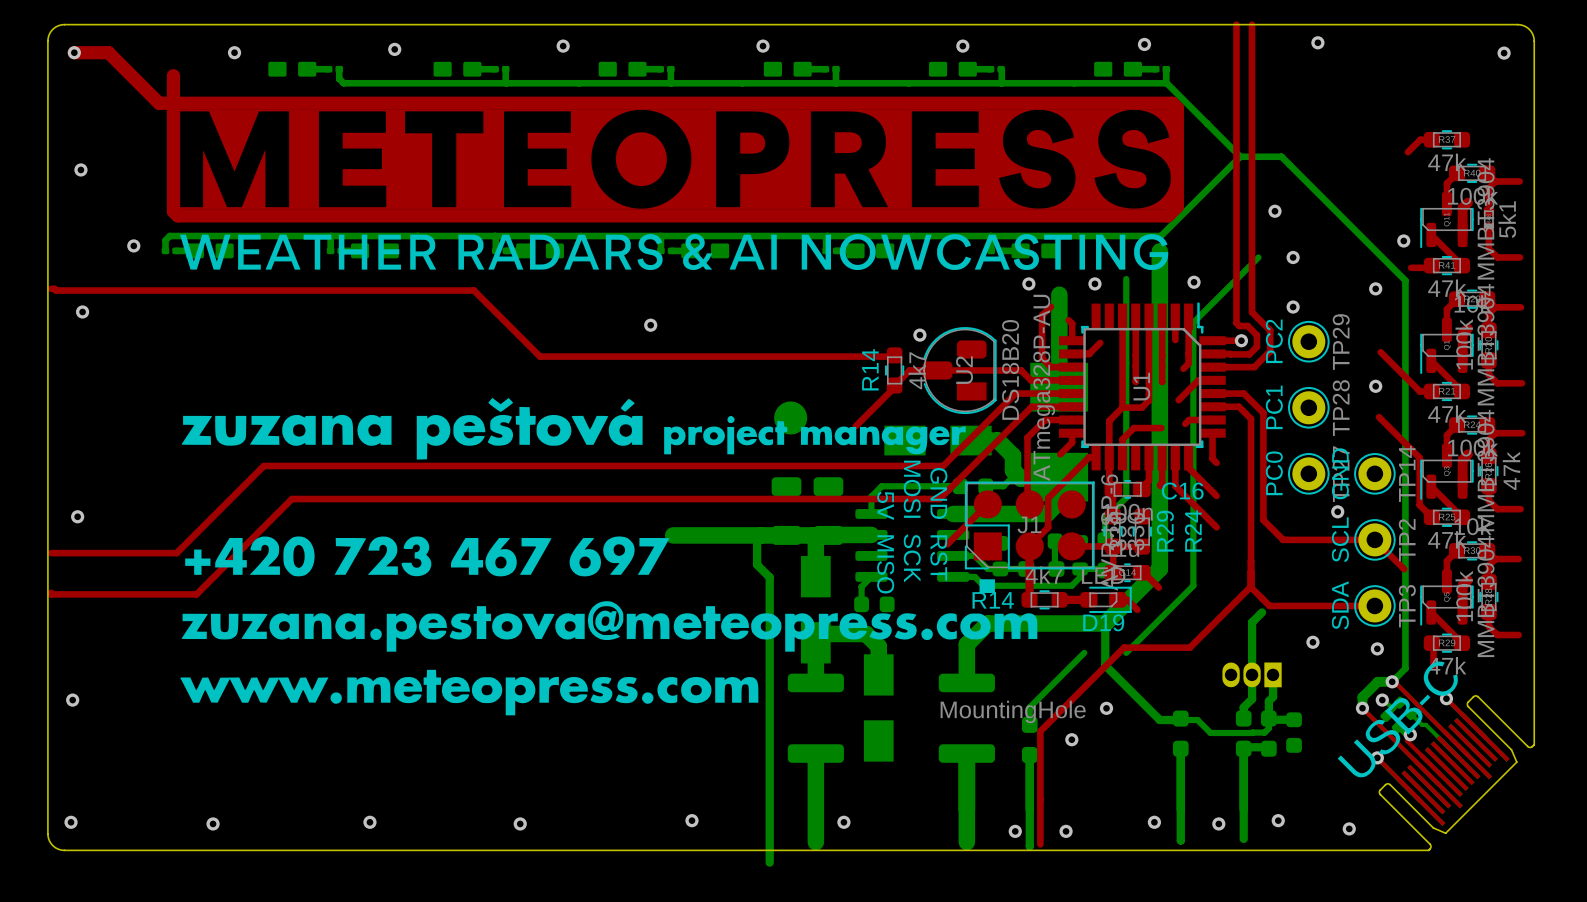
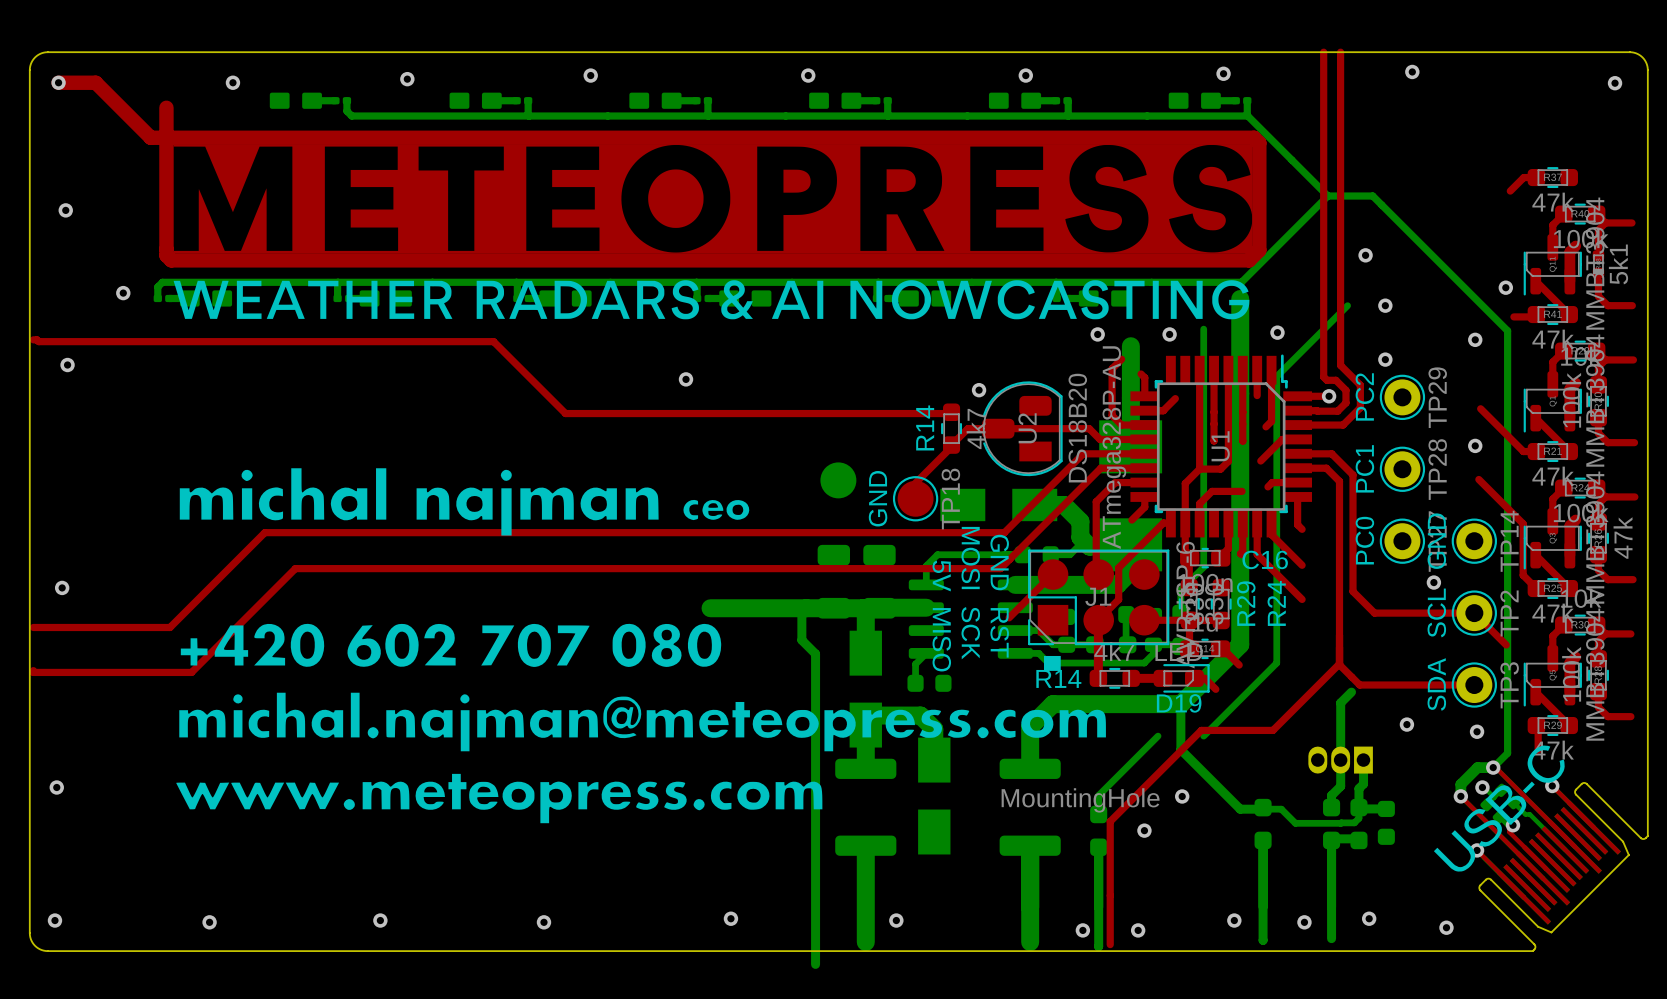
drawing shape: [180, 397, 1038, 716] -> [176, 468, 1106, 824]
TP18: none -> GND (915, 498)

